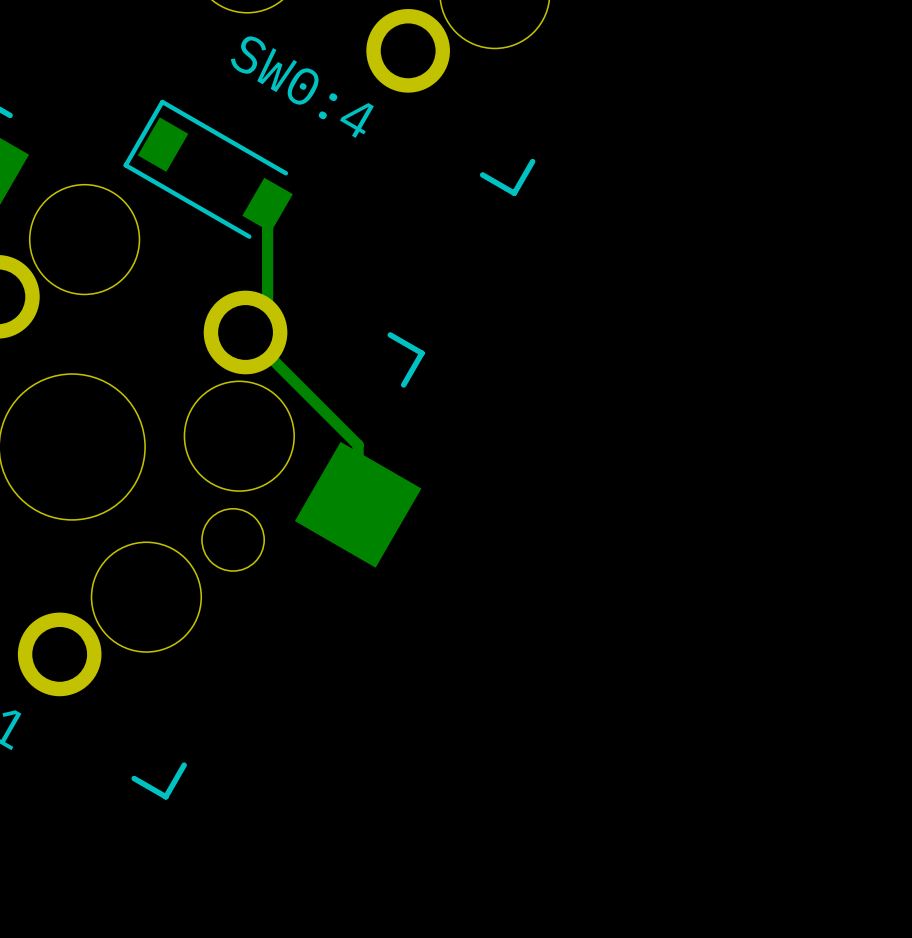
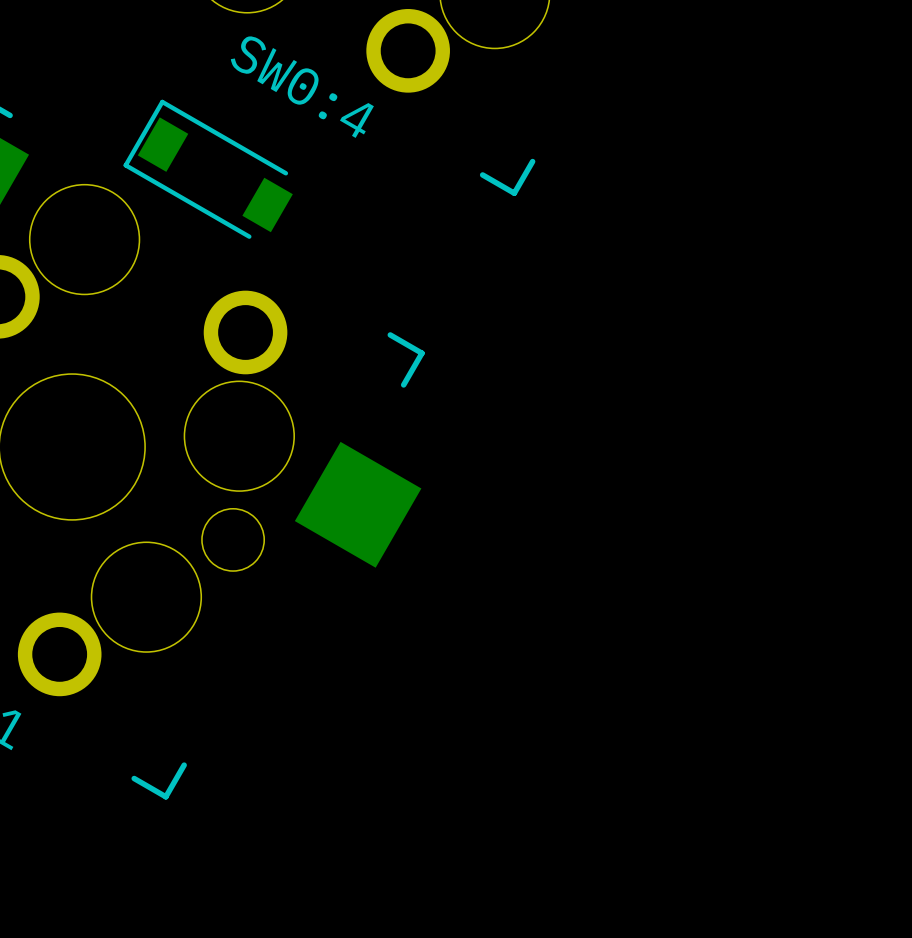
track: (267, 204) (267, 310) (245, 332) (358, 445) (358, 504) -> none

